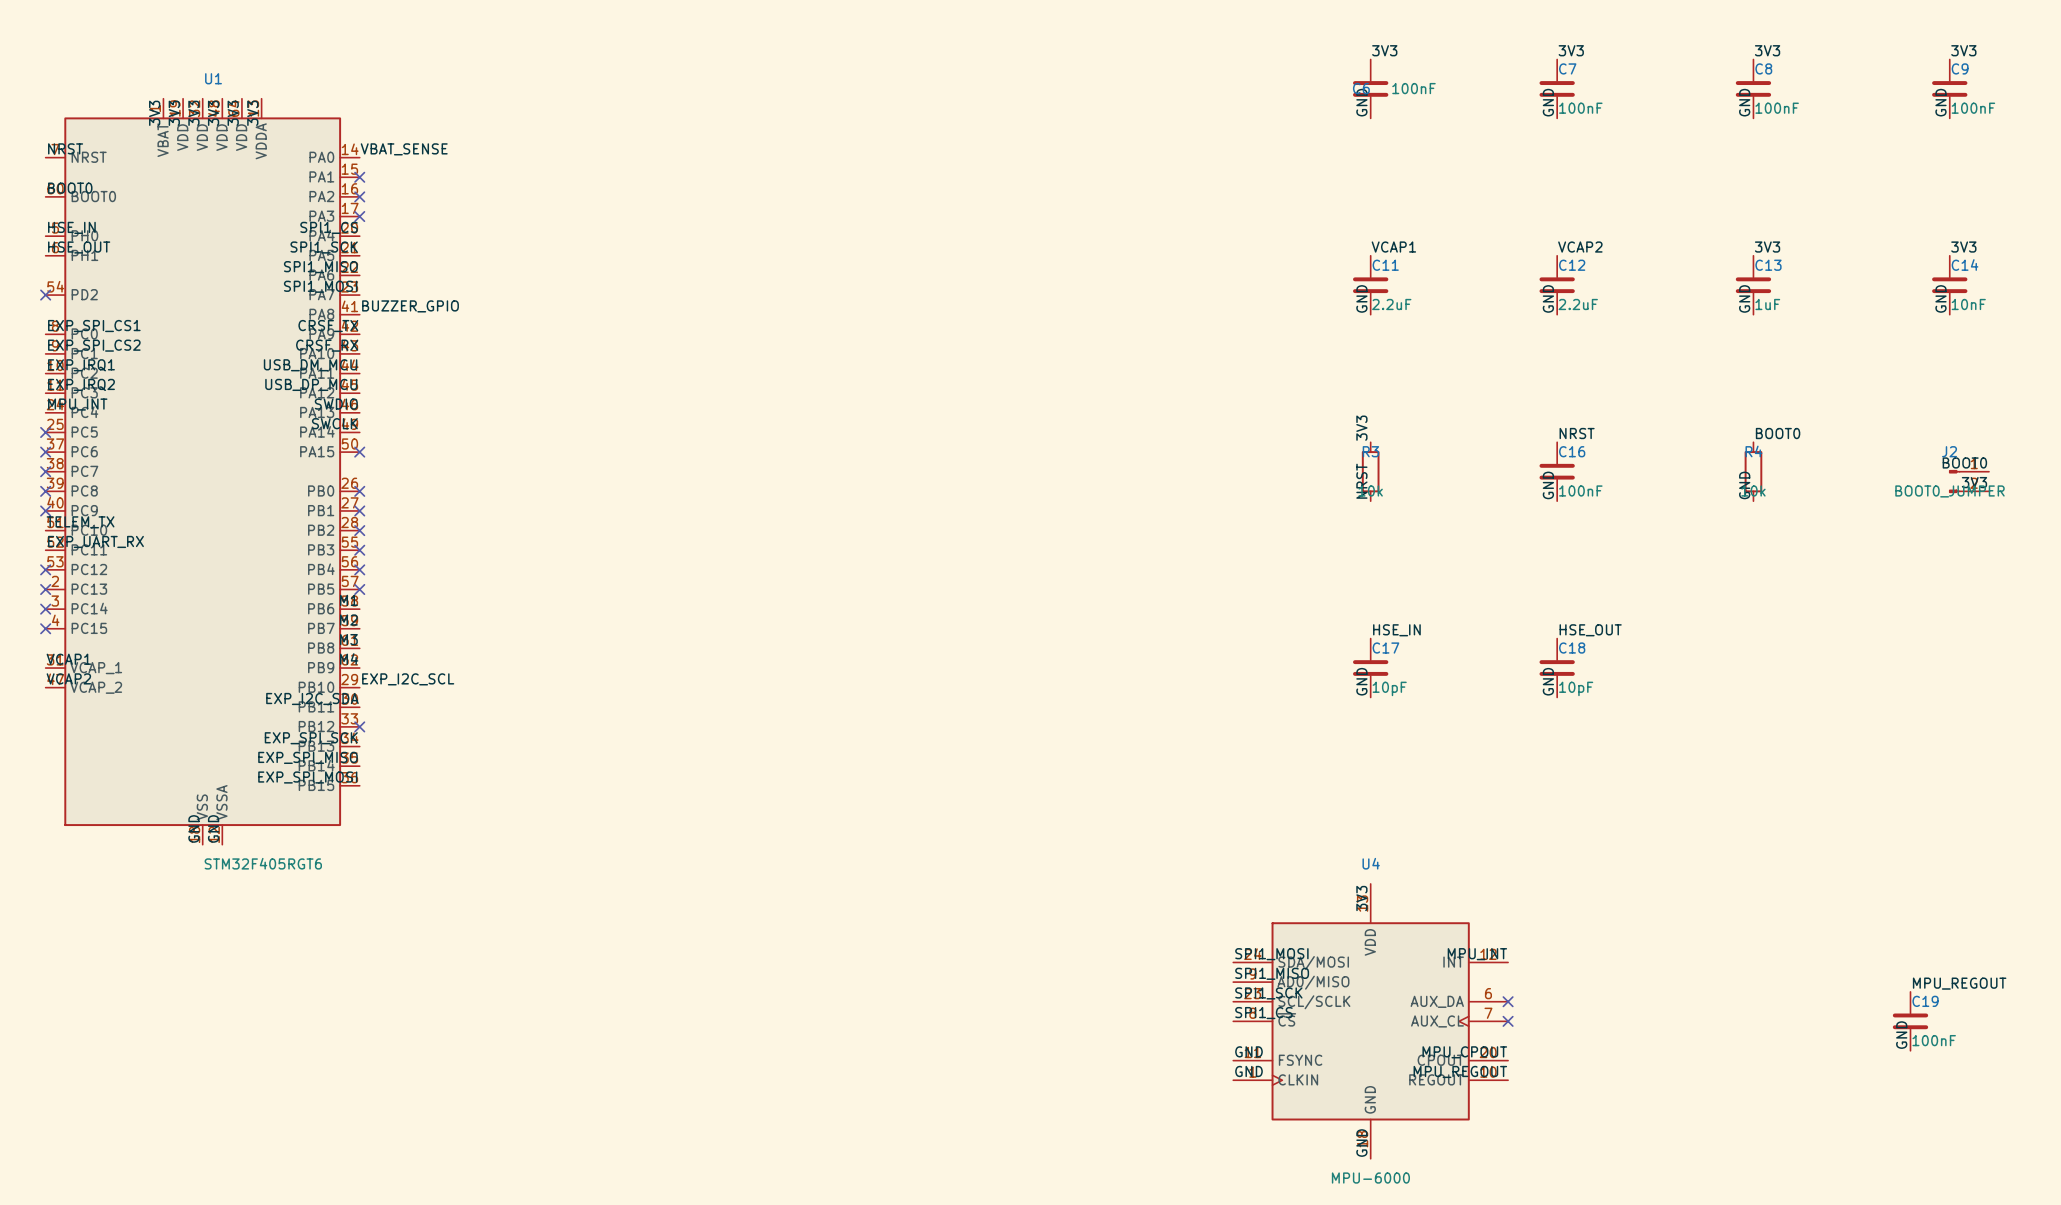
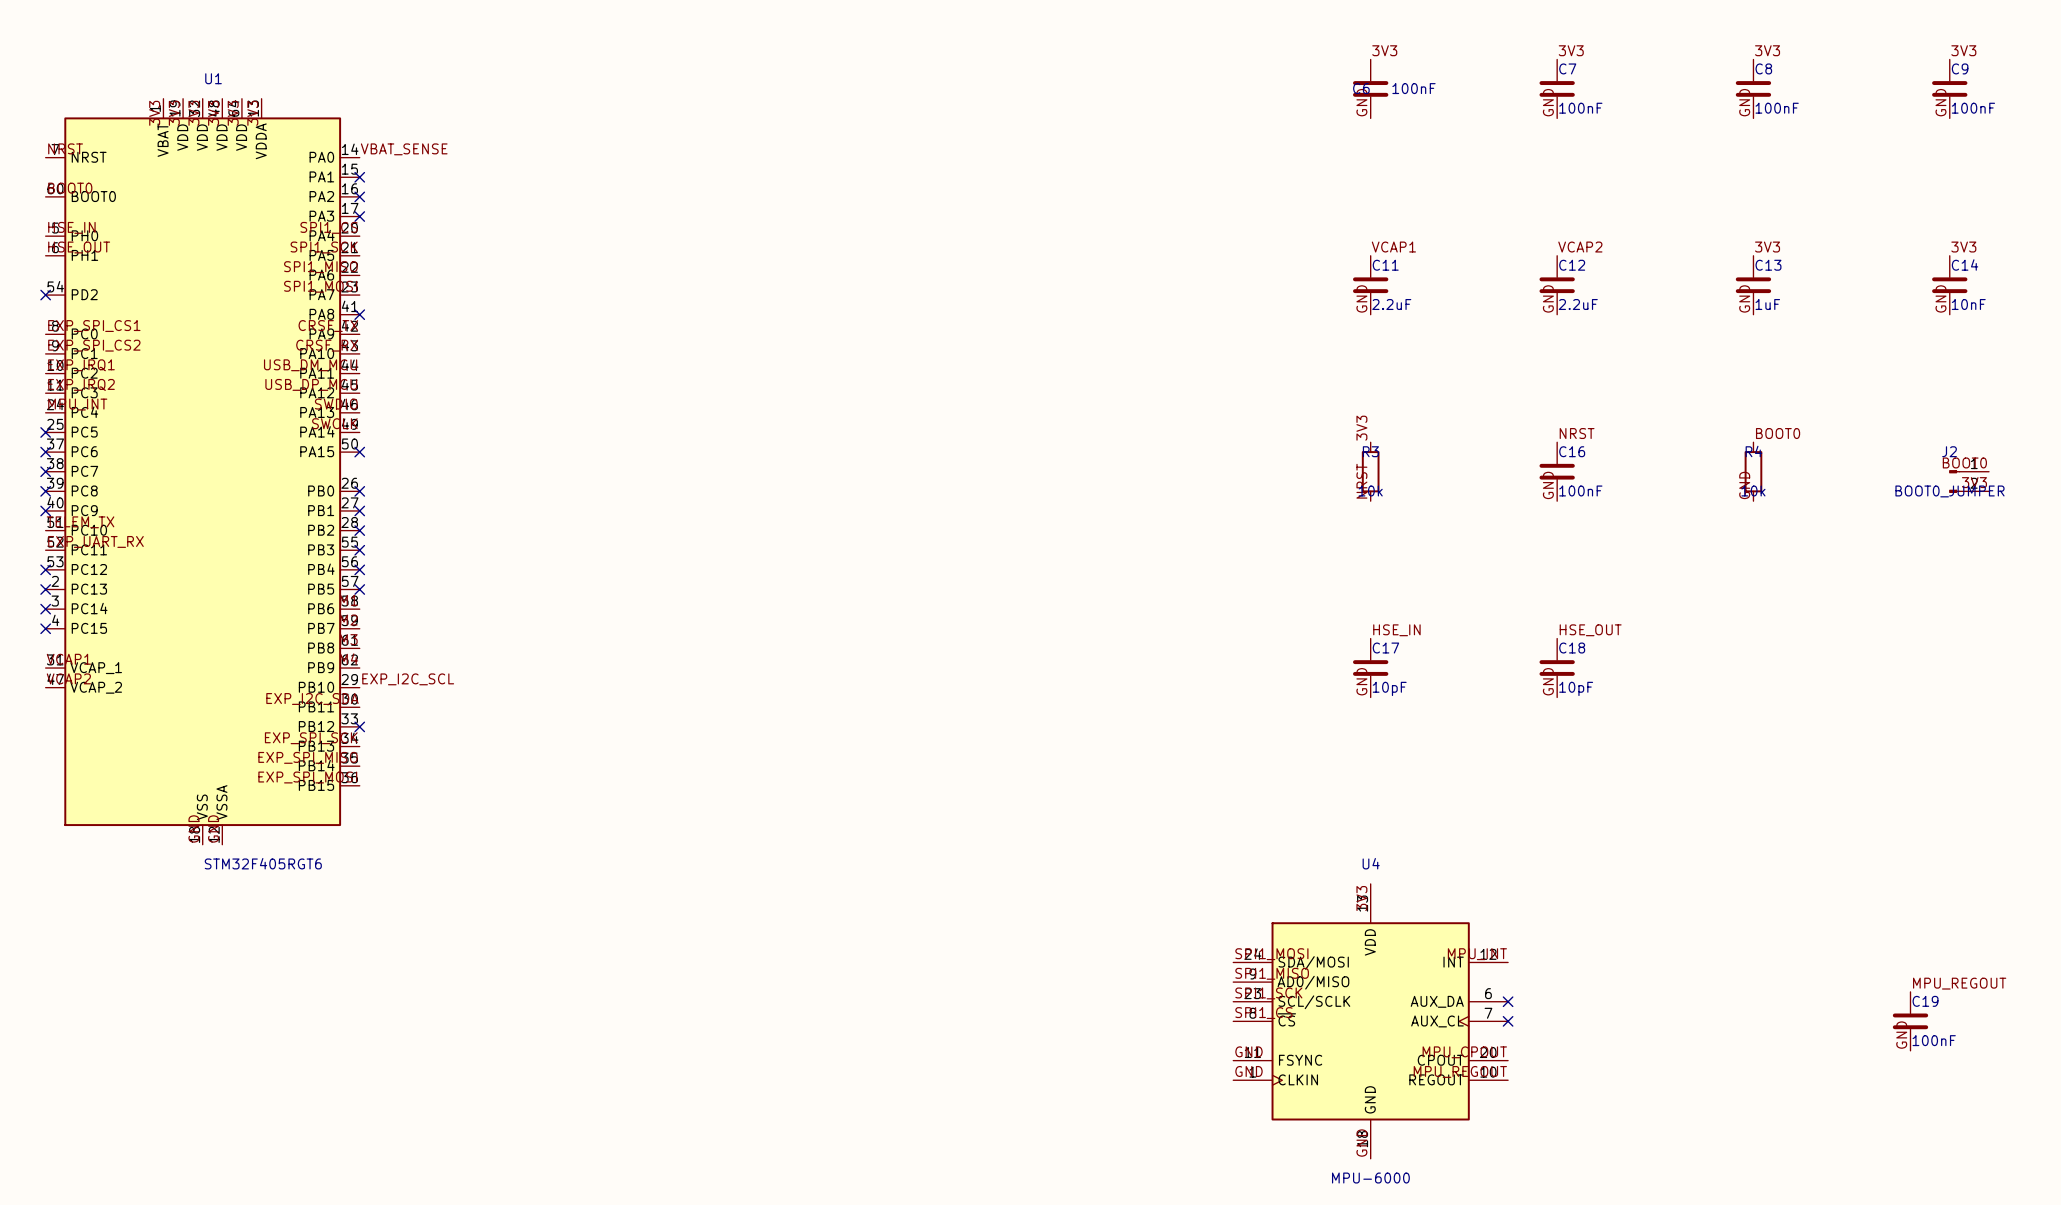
label: BUZZER_GPIO (410, 306) -> none
no-connect mark: none -> (359, 314)

